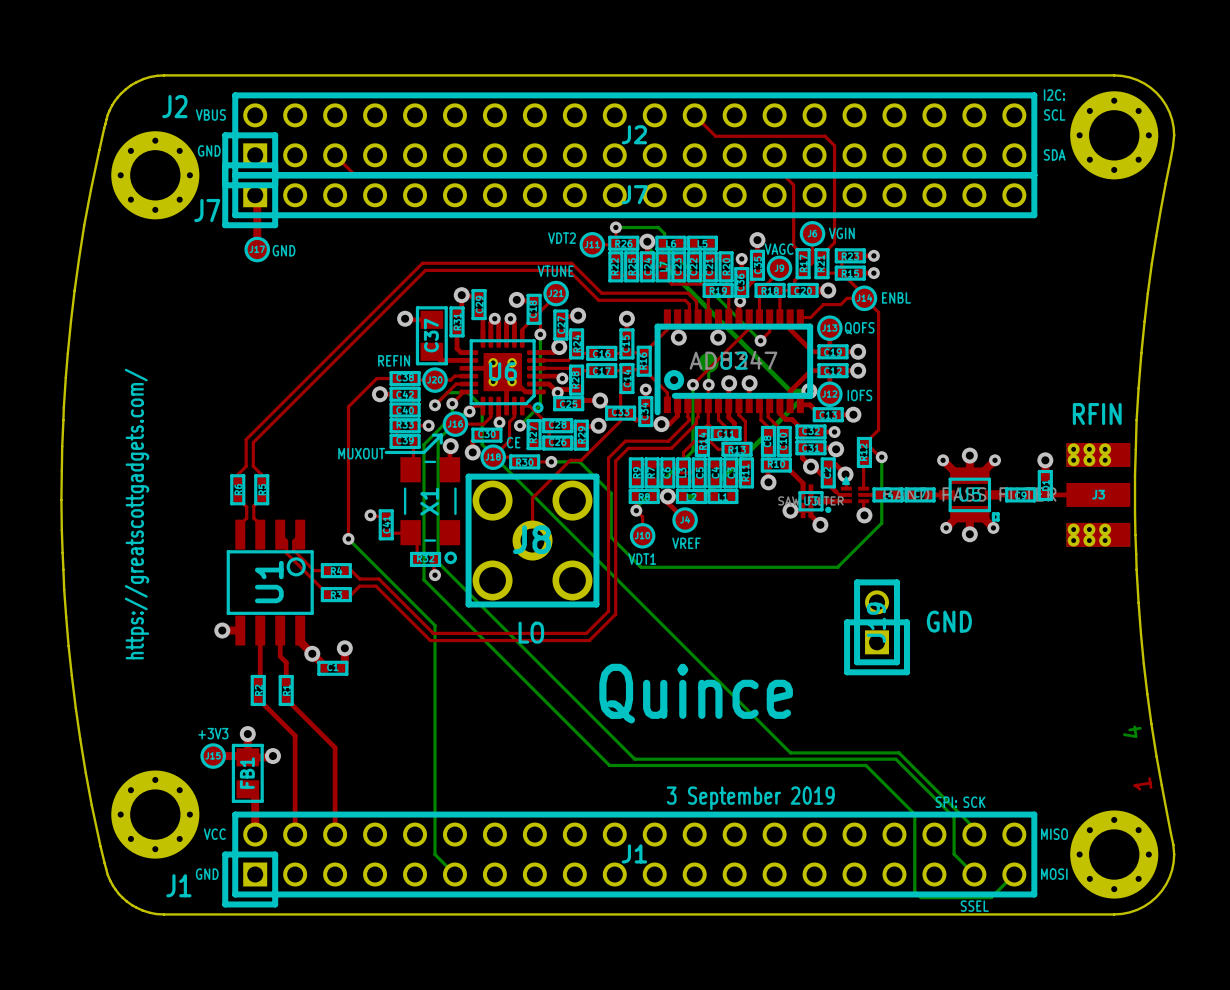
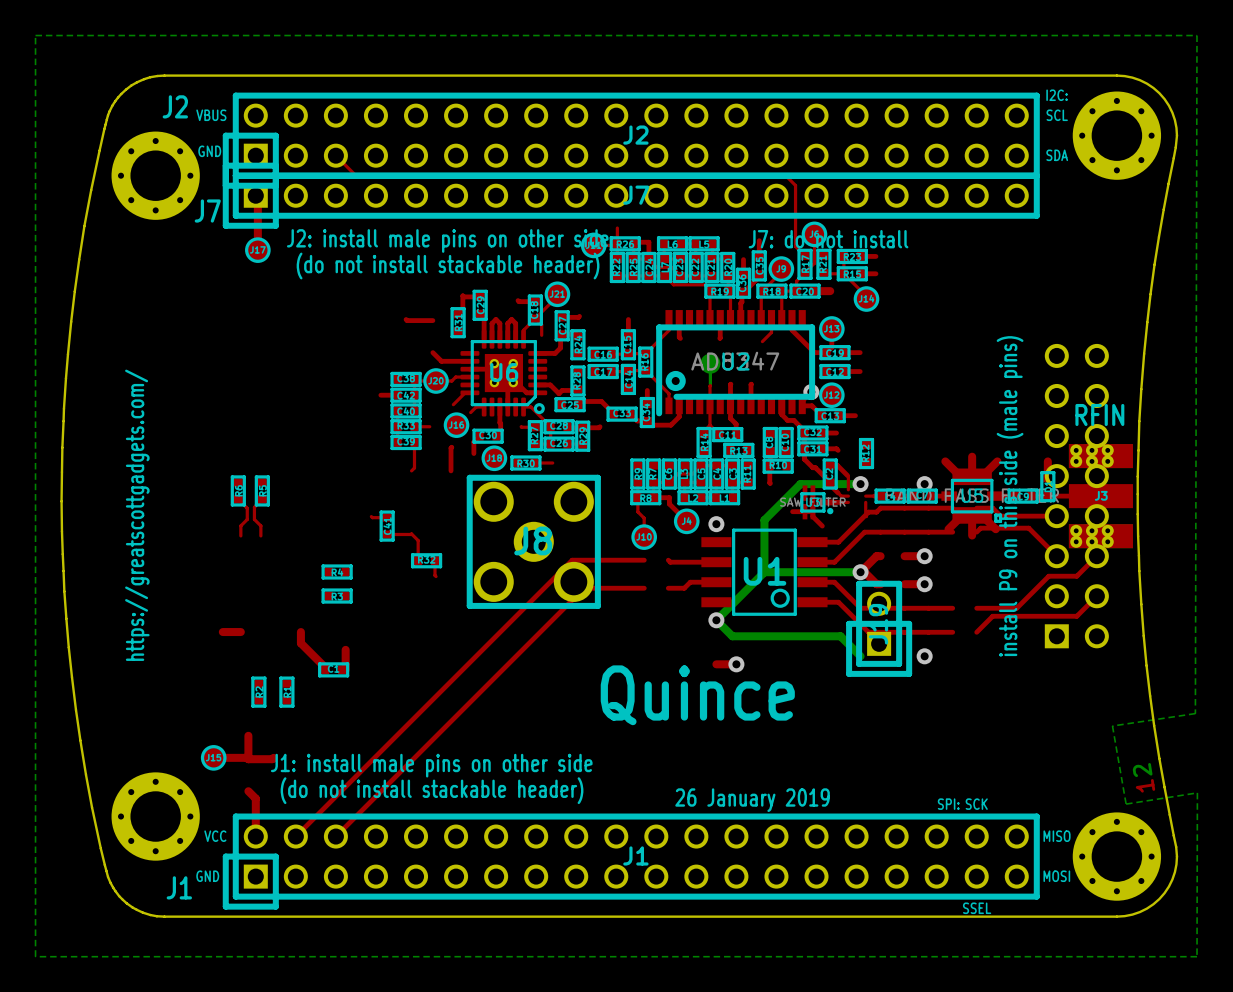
bottom zone outline: none -> (35, 35) (1197, 35) (1195, 713) (1112, 726) (1126, 804) (1197, 792) (1197, 956) (35, 956) (35, 35)
top track: (694, 115) (715, 136) (825, 136) (834, 145) (834, 242) (821, 255) -> none
bottom track: (615, 227) (658, 227) (664, 233) (664, 244) (760, 340) -> none
via: (615, 227) -> none
text: VGIN (841, 233) -> none
text: VDT2 (562, 238) -> none
text: none -> J7: do not install (828, 239)
text: none -> J2: install male pins on other side (447, 240)
via: (757, 240) -> none
bottom track: (647, 241) (647, 247) (790, 391) (809, 391) (703, 496) (667, 496) -> none
via: (647, 241) -> none
text: VAGC (779, 249) -> none
text: GND (283, 250) -> none
via: (873, 255) -> none
via: (741, 258) -> none
text: none -> (do not install stackable header) (448, 266)
text: VTUNE (555, 271) -> none
via: (873, 273) -> none
via: (828, 290) -> none
via: (461, 295) -> none
text: ENBL (896, 297) -> none
via: (516, 299) -> none
via: (740, 301) -> none
via: (578, 315) -> none
top track: (687, 317) (689, 304) (685, 300) (598, 300) (568, 270) (425, 270) (253, 442) (253, 466) (261, 474) (261, 481) -> none
top track: (698, 317) (696, 301) (688, 293) (601, 293) (571, 263) (422, 263) (246, 439) (246, 466) (237, 474) (237, 481) -> none
top track: (749, 317) (749, 328) (692, 384) -> none
top track: (800, 317) (810, 317) (823, 304) (840, 304) (847, 298) (864, 298) (878, 312) (878, 429) (864, 444) (867, 444) (881, 457) -> none
via: (405, 318) -> none
via: (494, 318) -> none
via: (510, 318) -> none
via: (626, 318) -> none
text: QOFS (859, 328) -> none
top track: (457, 330) (457, 348) (460, 352) (468, 352) -> none
bottom track: (540, 334) (540, 405) (519, 425) -> none
via: (540, 334) -> none
C37: (431, 335) -> none
via: (678, 337) -> none
via: (718, 337) -> none
via: (760, 340) -> none
via: (559, 347) -> none
via: (858, 351) -> none
top track: (593, 353) (576, 352) (568, 360) (536, 360) -> none
text: REFIN (394, 360) -> none
top track: (536, 368) (573, 368) (576, 371) (593, 370) -> none
via: (858, 370) -> none
top track: (536, 376) (560, 376) (562, 378) -> none
top track: (396, 378) (376, 378) (348, 406) (348, 538) -> none
via: (562, 378) -> none
via: (729, 383) -> none
via: (749, 383) -> none
top track: (468, 384) (456, 384) (435, 405) -> none
bottom track: (692, 384) (692, 450) (636, 507) (636, 510) -> none
via: (692, 384) -> none
via: (708, 384) -> none
top track: (626, 386) (620, 393) (620, 421) (581, 460) (570, 460) (532, 498) (532, 540) -> none
via: (645, 389) -> none
via: (557, 392) -> none
via: (379, 394) -> none
top track: (829, 394) (829, 375) (824, 370) (810, 370) (790, 391) (790, 404) -> none
text: IOFS (859, 395) -> none
via: (600, 400) -> none
bottom track: (452, 403) (452, 416) (423, 444) (423, 579) (609, 765) (866, 765) (914, 814) (914, 891) (921, 897) (991, 897) (1014, 874) -> none
via: (452, 403) -> none
top track: (687, 404) (689, 420) (668, 441) (625, 441) (608, 458) (608, 611) (586, 633) (433, 633) (378, 579) (359, 579) (351, 570) (344, 570) -> none
top track: (698, 404) (696, 423) (671, 448) (628, 448) (615, 461) (615, 614) (589, 640) (430, 640) (376, 586) (359, 586) (351, 594) (344, 594) -> none
top track: (718, 404) (718, 419) (726, 427) (726, 446) (728, 449) (718, 449) (710, 441) (694, 441) (683, 452) (683, 464) (636, 464) -> none
top track: (738, 404) (738, 415) (745, 421) (746, 464) -> none
top track: (759, 404) (760, 419) (768, 427) (768, 433) -> none
top track: (769, 404) (768, 416) (784, 433) -> none
bottom track: (435, 405) (447, 392) (468, 392) (482, 406) (482, 444) (790, 752) (899, 752) (974, 828) (974, 834) -> none
via: (435, 405) -> none
top track: (490, 406) (490, 417) (483, 424) (455, 424) -> none
top track: (514, 406) (514, 417) (509, 421) (509, 440) (493, 457) (511, 457) (516, 461) -> none
bottom track: (469, 411) (466, 411) (438, 439) (438, 562) (634, 759) (895, 759) (954, 817) (954, 854) (974, 874) -> none
via: (469, 411) -> none
via: (853, 414) -> none
via: (499, 422) -> none
via: (661, 424) -> none
via: (428, 425) -> none
via: (519, 425) -> none
via: (598, 425) -> none
via: (834, 432) -> none
line: (433, 435) (441, 435) -> none
line: (441, 435) (441, 443) -> none
line: (441, 435) (423, 452) (386, 452) -> none
text: CE (513, 442) -> none
via: (450, 446) -> none
top track: (784, 449) (784, 465) (803, 483) (803, 491) -> none
via: (836, 449) -> none
via: (472, 452) -> none
text: MUXOUT (361, 453) -> none
via: (969, 455) -> none
bottom track: (881, 457) (881, 523) (837, 567) (641, 567) (611, 537) (611, 493) (579, 461) (551, 461) -> none
via: (881, 457) -> none
top track: (864, 460) (863, 488) -> none
via: (943, 460) -> none
via: (995, 460) -> none
via: (1045, 460) -> none
via: (551, 461) -> none
via: (810, 466) -> none
via position: (845, 474) -> (860, 484)
via: (768, 482) -> none
bottom track: none -> (860, 484) (800, 484) (764, 520) (764, 572)
via: none -> (924, 484)
part: (855, 489) -> none
part: none -> (1076, 496)
text: none -> install P9 on this side (male pins) (1010, 496)
via: (667, 496) -> none
X1: (430, 501) -> none
top track: none -> (952, 508) (880, 508) (876, 512) (868, 512) (838, 542) (812, 542)
top track: none -> (976, 508) (992, 508) (1000, 516) (1056, 516)
via: (636, 510) -> none
via: (790, 510) -> none
via: (370, 515) -> none
via: (864, 515) -> none
via: none -> (716, 524)
via: (820, 524) -> none
via: (946, 527) -> none
via: (993, 527) -> none
top track: none -> (952, 532) (864, 532) (834, 562) (812, 562)
top track: none -> (976, 532) (980, 528) (1028, 528) (1056, 556)
top track: (280, 534) (286, 541) (286, 553) (327, 594) -> none
top track: (300, 534) (293, 541) (293, 550) (314, 570) (327, 570) -> none
via: (969, 534) -> none
bottom track: (348, 538) (435, 625) (435, 854) (454, 874) -> none
via: (348, 538) -> none
text: VREF (686, 543) -> none
drawing: [444, 551, 458, 565] -> none
top track: none -> (880, 556) (876, 556) (860, 572) (864, 572) (876, 584) (880, 584)
top track: none -> (904, 556) (924, 556)
via: none -> (924, 556)
top track: none -> (1096, 556) (1076, 576) (1048, 576) (1016, 608) (976, 608)
top track: none -> (668, 560) (670, 562) (716, 562)
text: VDT1 (642, 559) -> none
bottom track: none -> (764, 572) (860, 572)
bottom track: none -> (764, 572) (716, 620) (732, 636) (840, 636) (860, 656)
via: none -> (860, 572)
via: (435, 575) -> none
top track: none -> (716, 582) (690, 582) (684, 588) (668, 588)
top track: none -> (812, 582) (834, 582) (860, 608) (952, 608)
U1 rotation: 0° (270, 582) -> 90° clockwise (764, 572)
U1 position: (270, 582) -> (764, 572)
top track: none -> (904, 584) (924, 584)
via: none -> (924, 584)
top track: none -> (1096, 596) (1076, 616) (992, 616) (976, 632)
top track: none -> (812, 602) (838, 602) (868, 632) (952, 632)
via: none -> (716, 620)
text: GND (949, 621) -> none
via: (222, 630) -> none
top track: (260, 630) (260, 676) (258, 678) -> none
top track: (280, 630) (280, 656) (286, 662) (286, 678) -> none
text: LO (531, 632) -> none
via: (344, 648) -> none
via: (312, 653) -> none
via: none -> (924, 656)
top track: none -> (716, 664) (736, 664)
via: none -> (736, 664)
top track: (258, 698) (295, 735) (295, 834) -> (644, 560) (572, 560) (295, 836)
top track: (286, 698) (335, 747) (335, 834) -> (644, 588) (584, 588) (335, 836)
text: 4 (1132, 731) -> none
text: +3V3 (213, 733) -> none
via: (247, 734) -> none
via: (272, 756) -> none
text: none -> J1: install male pins on other side (431, 765)
text: none -> 2 (1142, 770)
FB1: (247, 773) -> none
text: none -> (do not install stackable header) (432, 790)
text: 3 September 2019 (750, 798) -> 26 January 2019 (752, 800)

